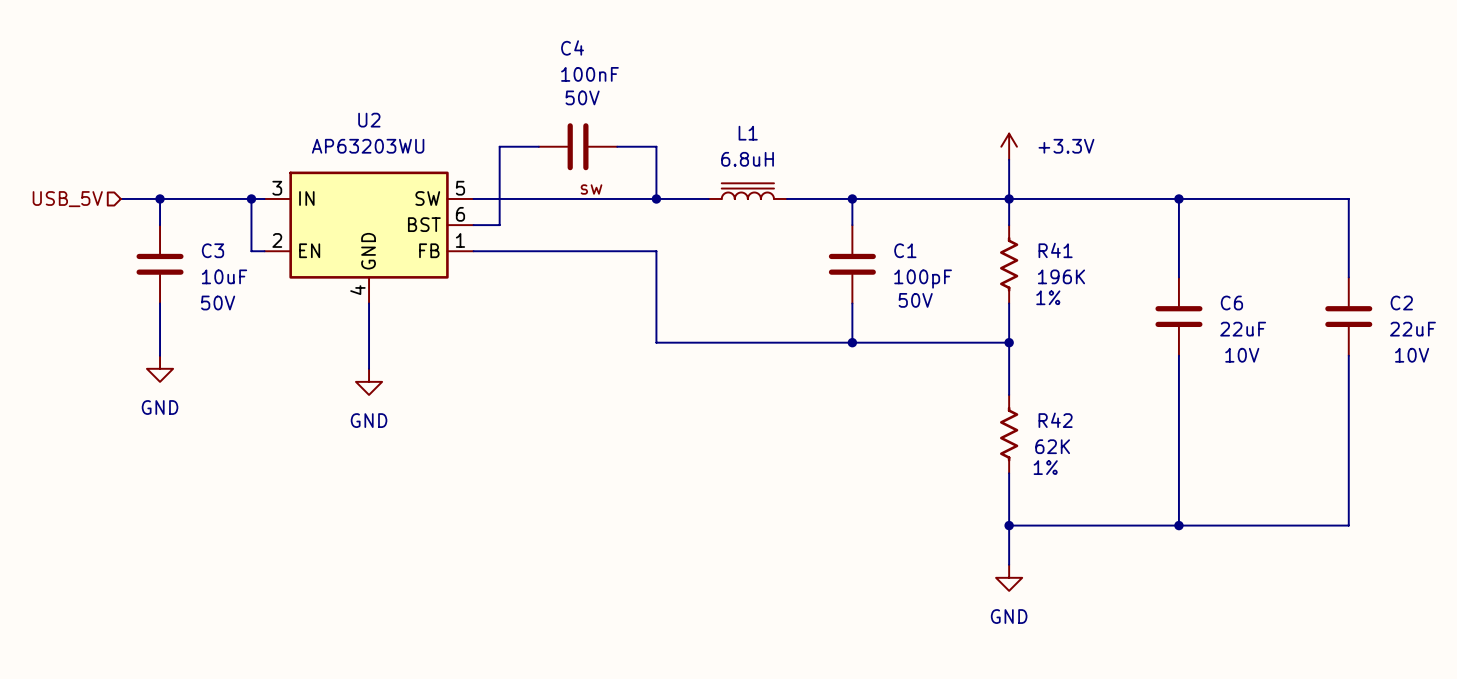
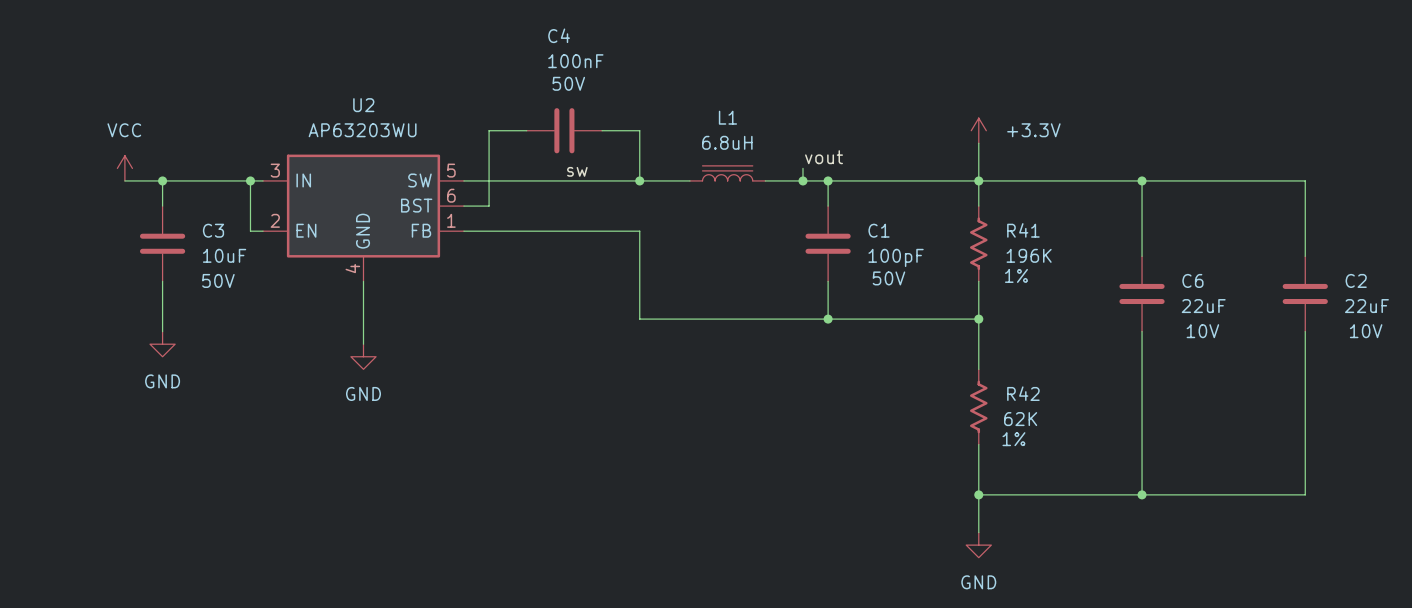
label: none -> vout (824, 157)
power symbol: none -> VCC (124, 168)
wire: none -> (802, 168) (802, 180)
junction: none -> (802, 180)
hierarchical label: USB_5V (67, 199) -> none

